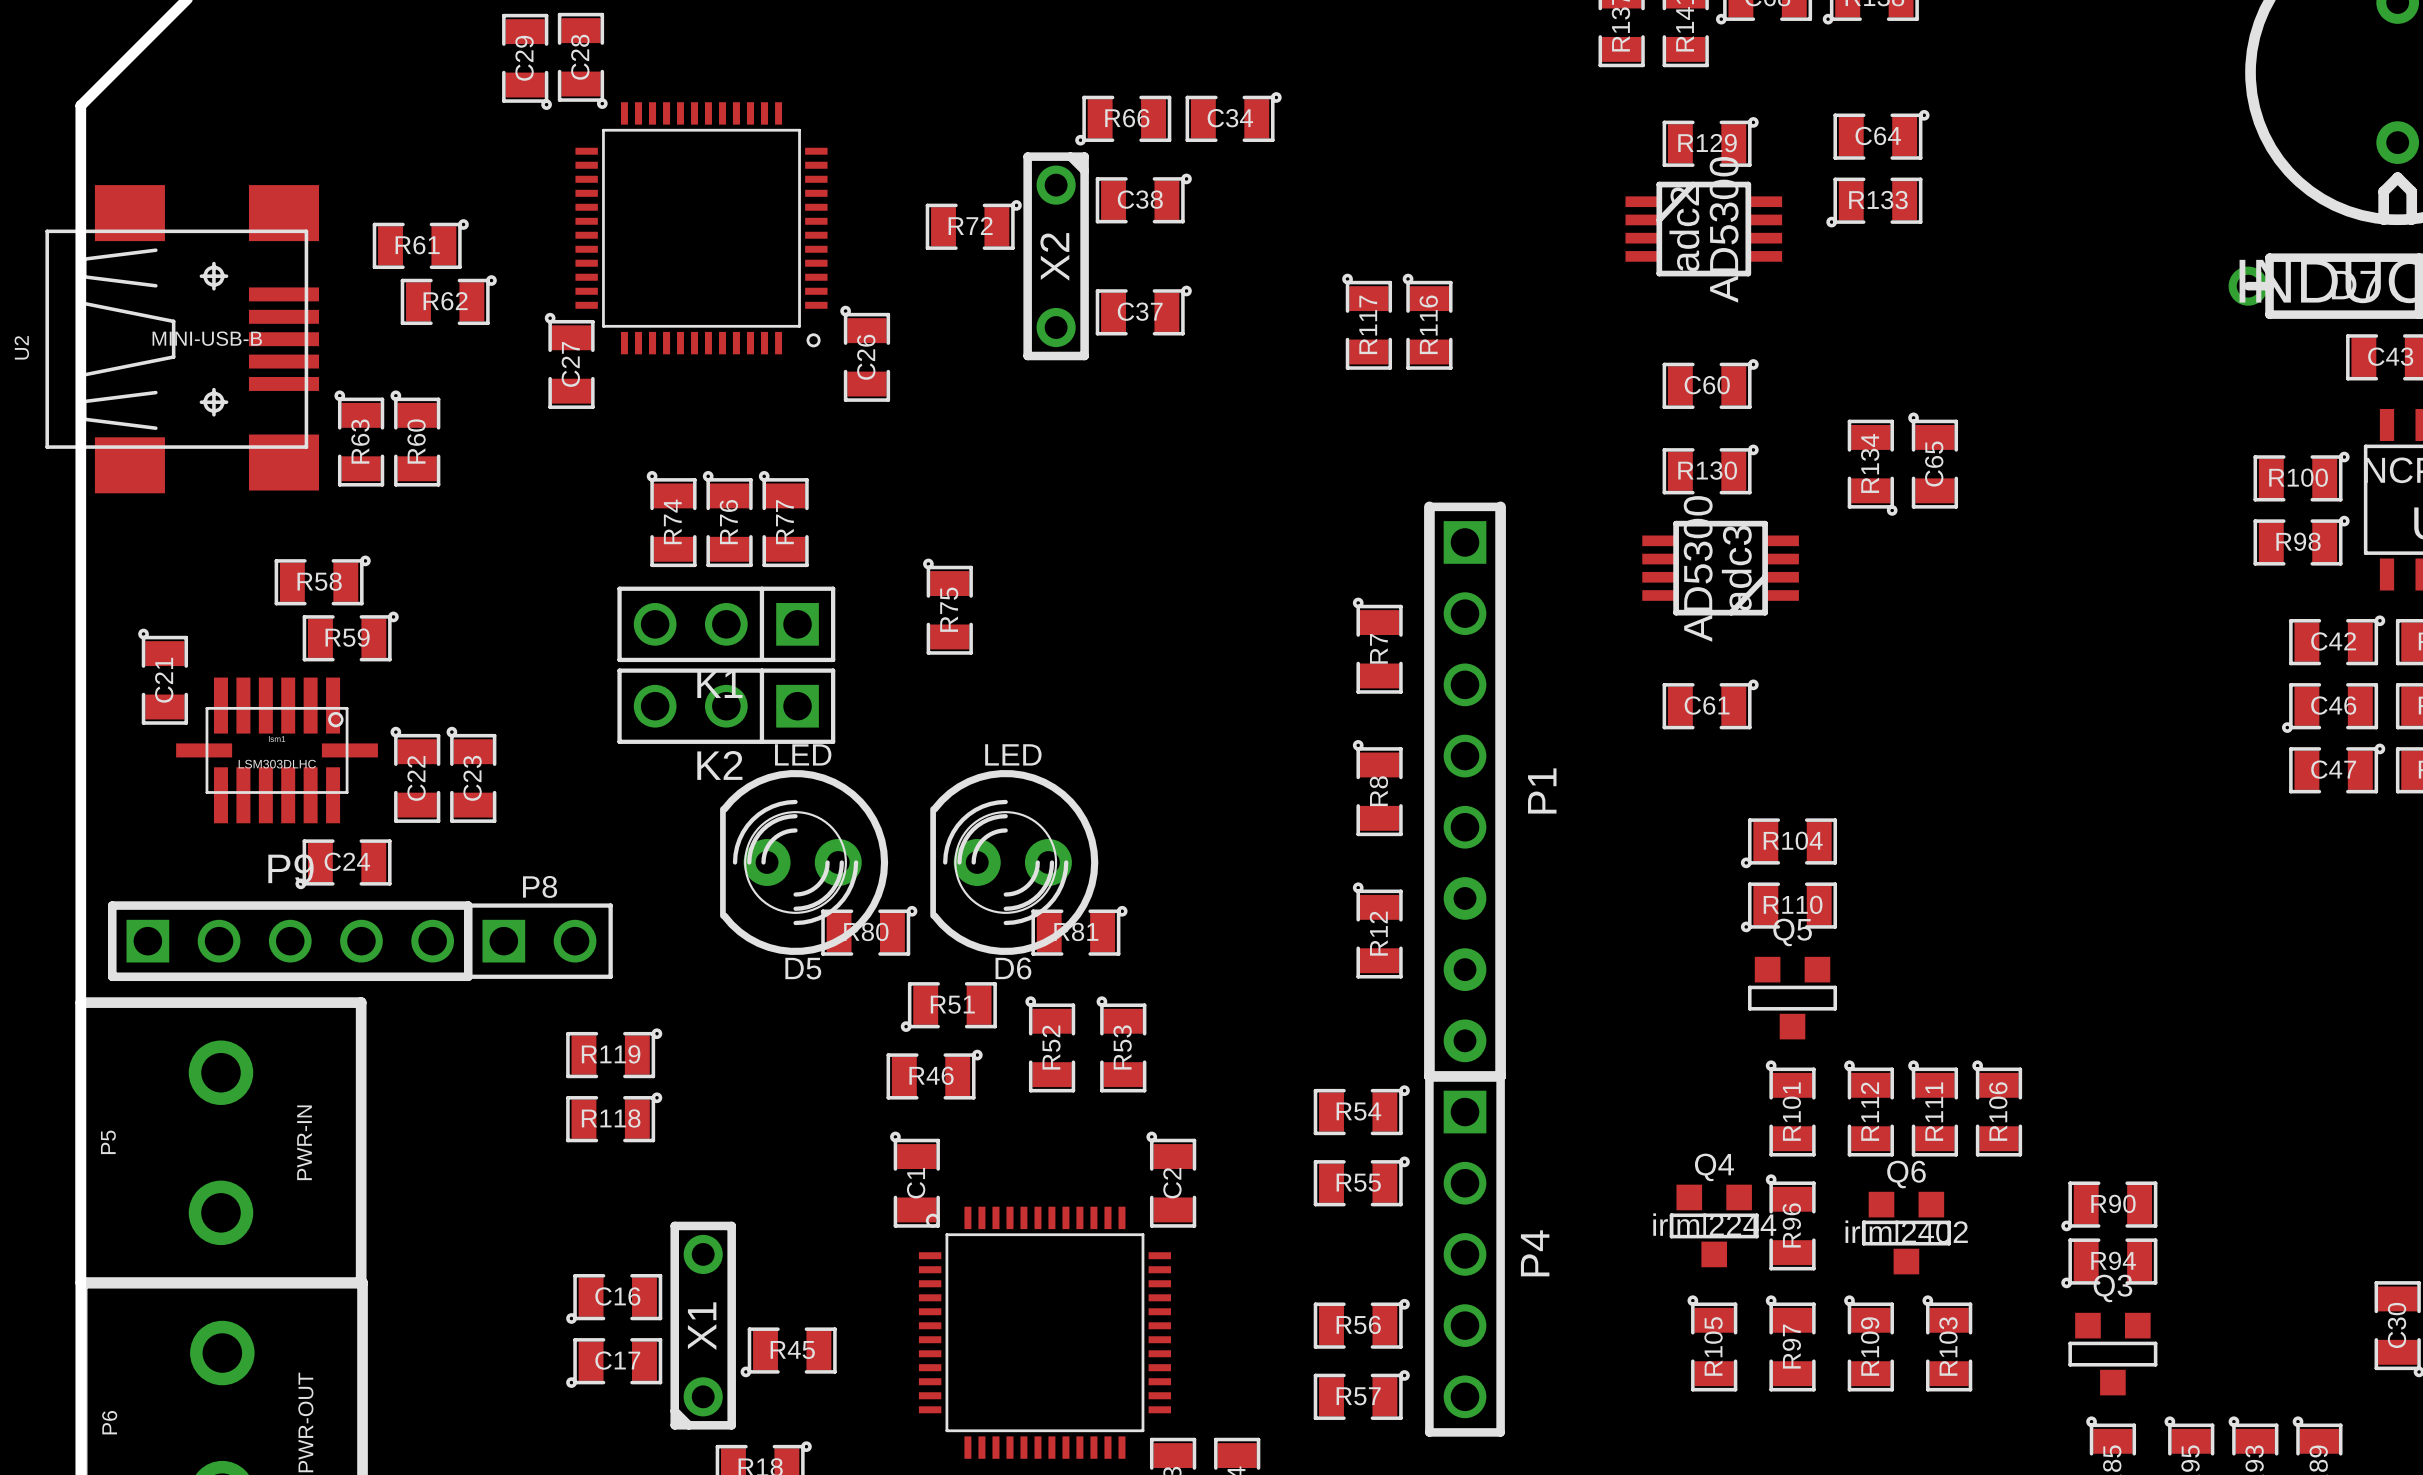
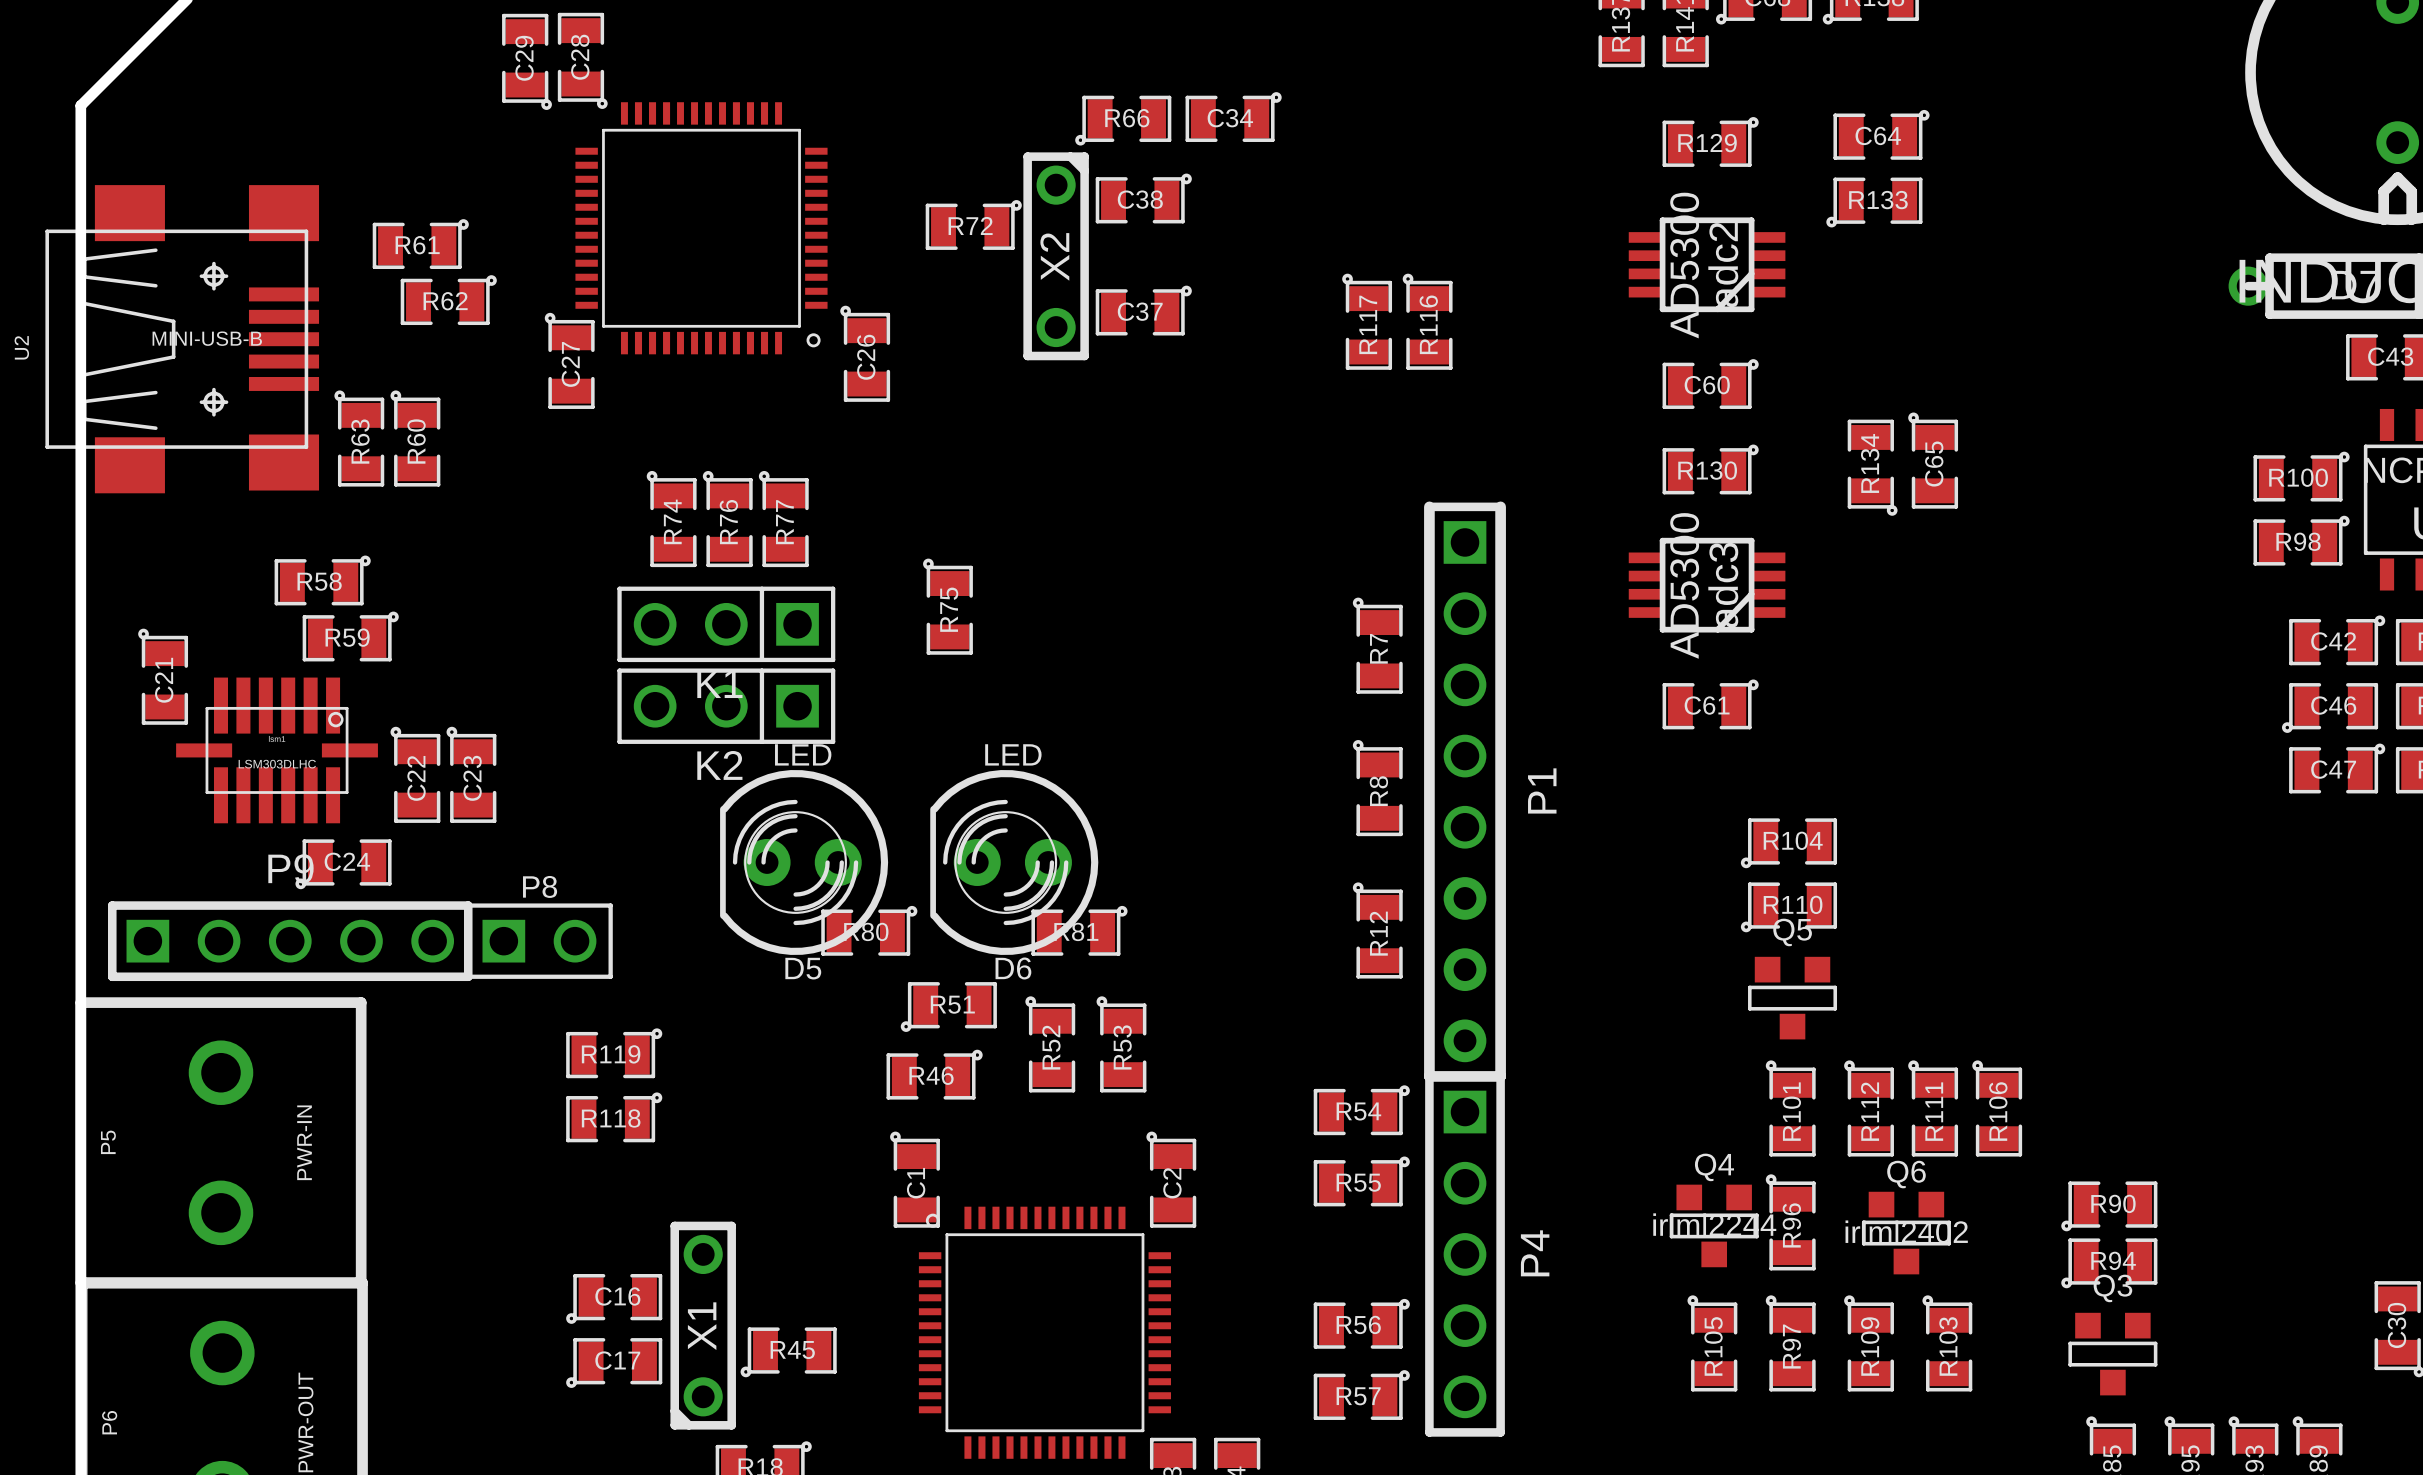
adc2 rotation: 0° (1703, 229) -> 180° (1707, 264)
adc3 position: (1720, 568) -> (1707, 585)

